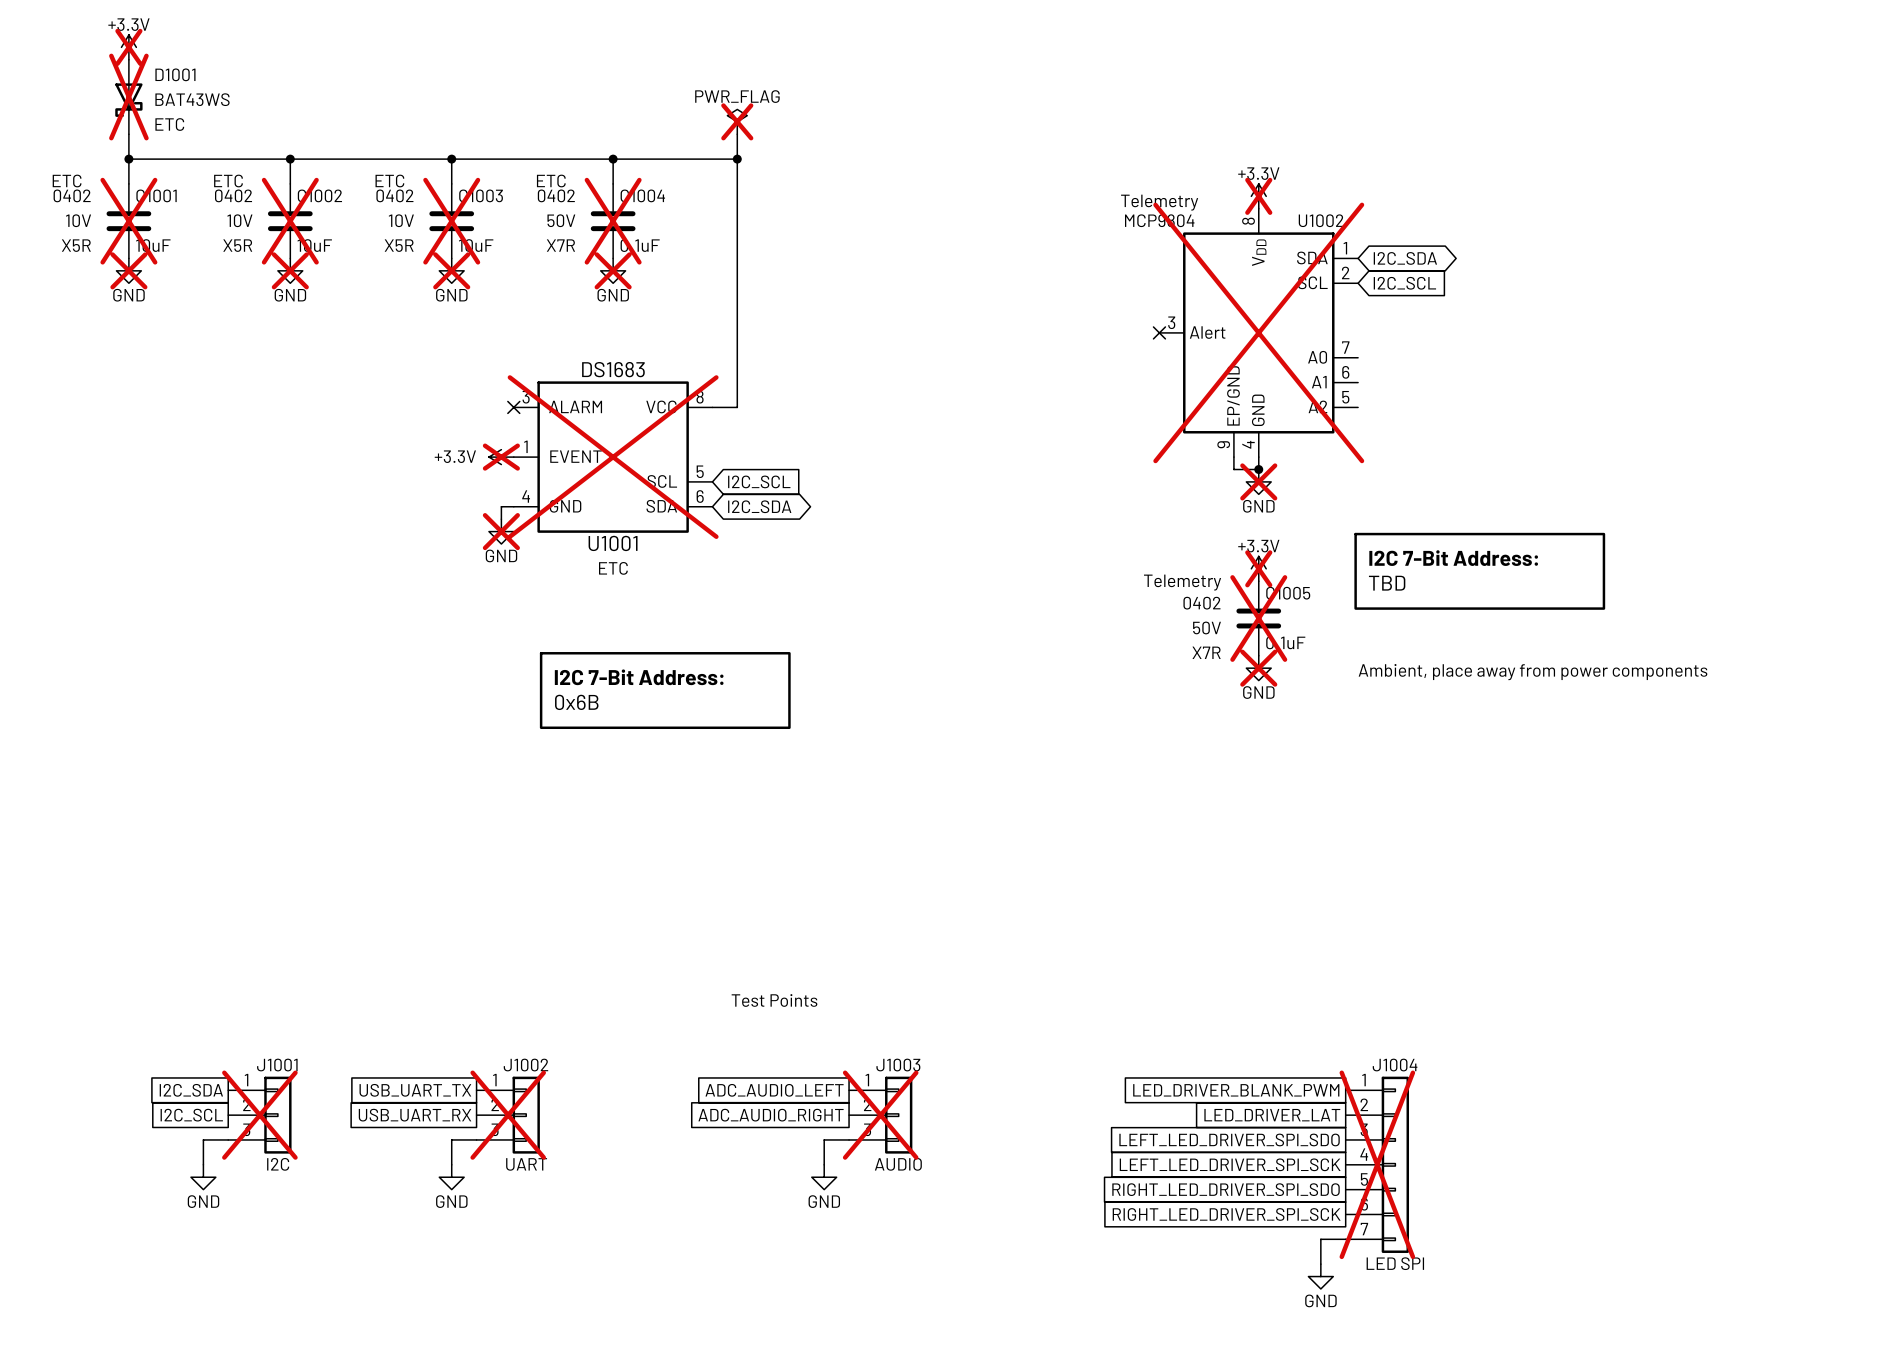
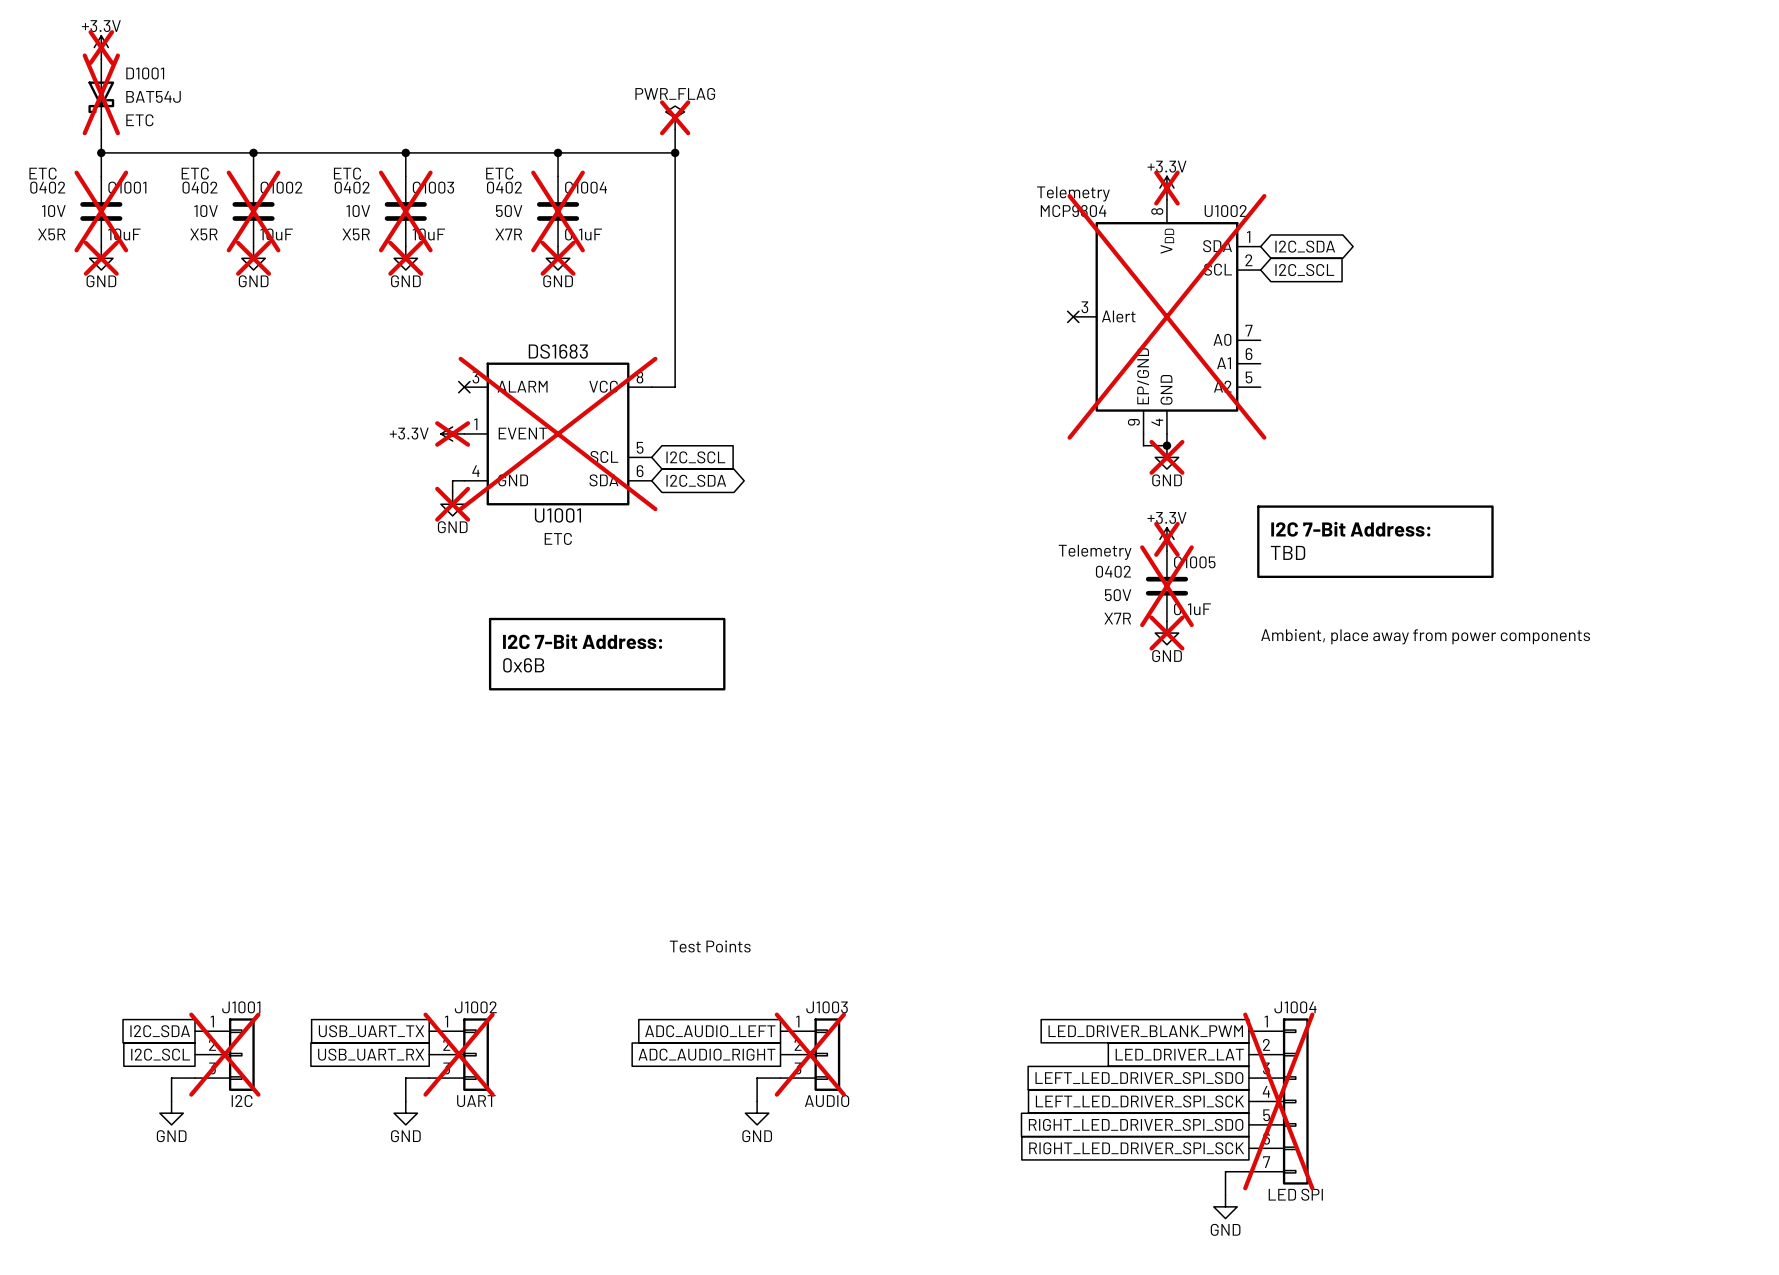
D1001 value: BAT43WS (192, 99) -> BAT54J (153, 96)

